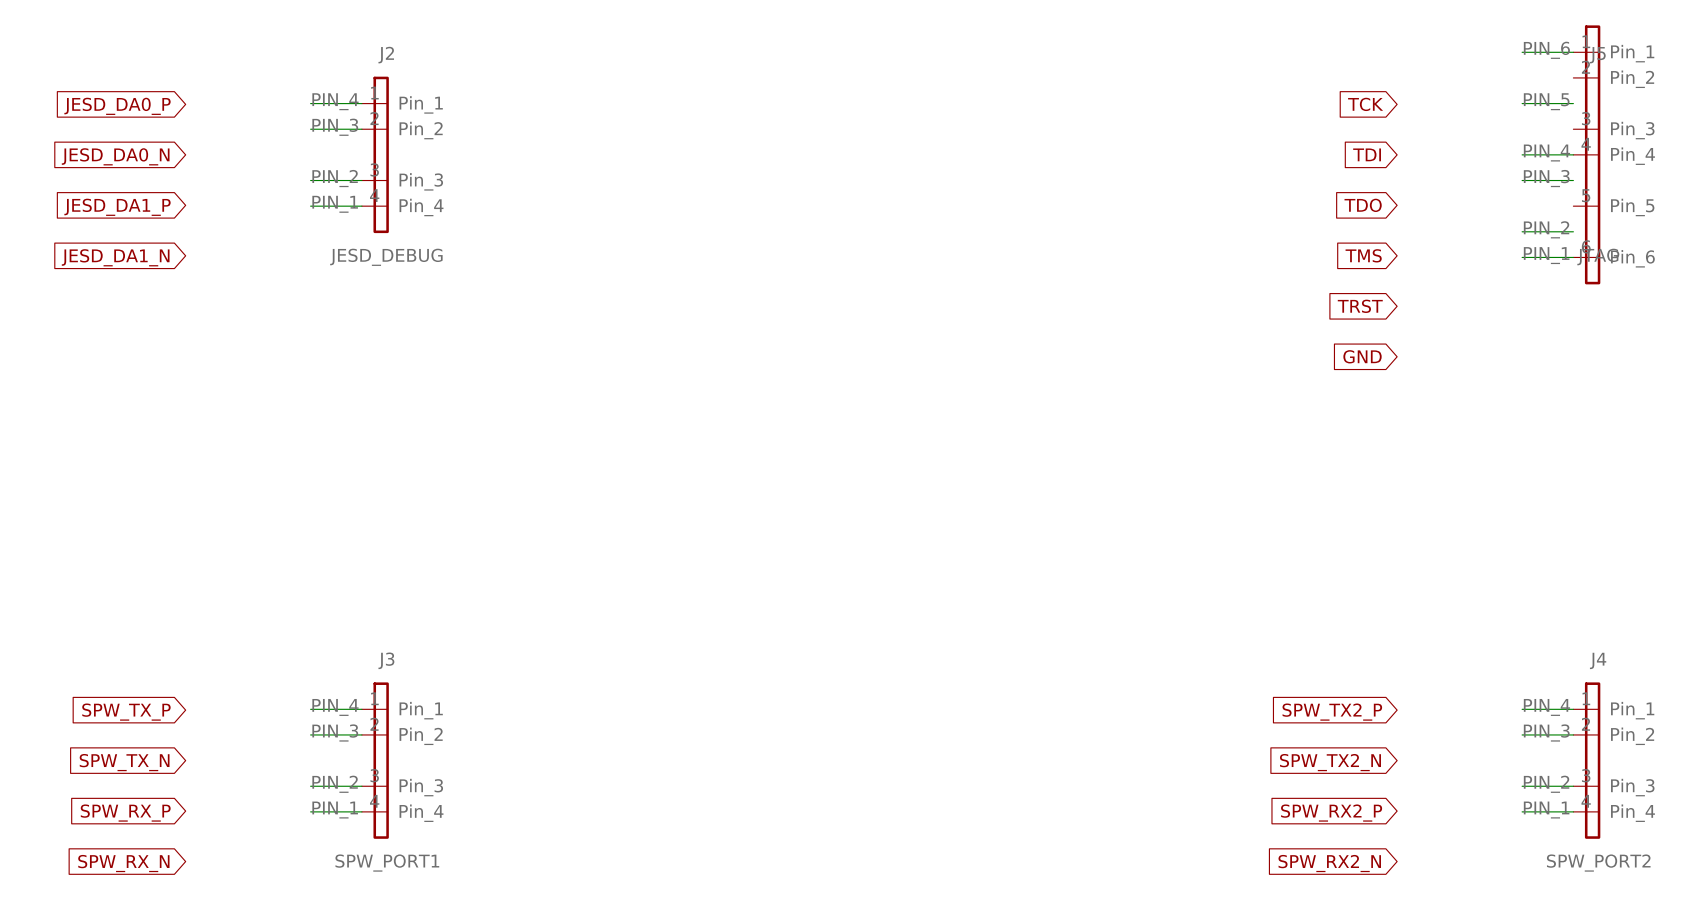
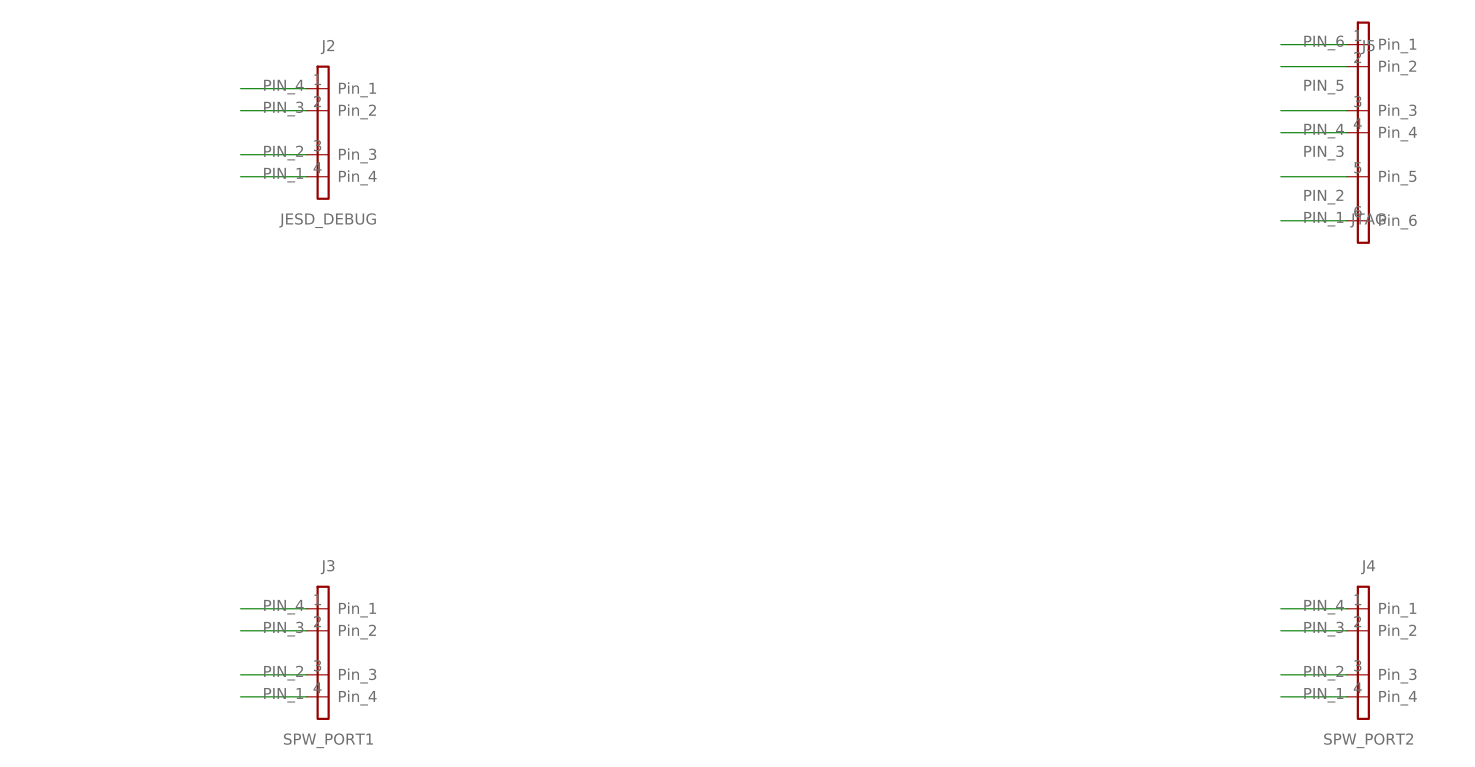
wire: none -> (1280, 44) (1302, 44)
wire: none -> (1280, 66) (1346, 66)
wire: none -> (240, 88) (262, 88)
wire: (1522, 103) (1573, 103) -> none
global label: TCK (1365, 104) -> none
global label: JESD_DA0_P (117, 106) -> none
wire: none -> (240, 110) (262, 110)
wire: none -> (1280, 110) (1346, 110)
global label: TDI (1367, 154) -> none
wire: none -> (1280, 132) (1302, 132)
global label: JESD_DA0_N (115, 156) -> none
wire: none -> (240, 154) (262, 154)
wire: (1522, 180) (1573, 180) -> none
global label: TDO (1363, 205) -> none
wire: none -> (240, 176) (262, 176)
wire: none -> (1280, 176) (1346, 176)
global label: JESD_DA1_P (117, 207) -> none
wire: (1522, 231) (1573, 231) -> none
global label: TMS (1363, 255) -> none
global label: JESD_DA1_N (115, 257) -> none
wire: none -> (1280, 220) (1302, 220)
global label: TRST (1360, 306) -> none
global label: GND (1362, 356) -> none
wire: none -> (240, 608) (262, 608)
wire: none -> (1280, 608) (1302, 608)
global label: SPW_TX_P (126, 712) -> none
global label: SPW_TX2_P (1332, 712) -> none
wire: none -> (240, 630) (262, 630)
wire: none -> (1280, 630) (1302, 630)
global label: SPW_TX_N (124, 762) -> none
global label: SPW_TX2_N (1330, 762) -> none
wire: none -> (240, 674) (262, 674)
wire: none -> (1280, 674) (1302, 674)
wire: none -> (240, 696) (262, 696)
wire: none -> (1280, 696) (1302, 696)
global label: SPW_RX_P (125, 813) -> none
global label: SPW_RX2_P (1331, 813) -> none
global label: SPW_RX_N (123, 863) -> none
global label: SPW_RX2_N (1329, 863) -> none

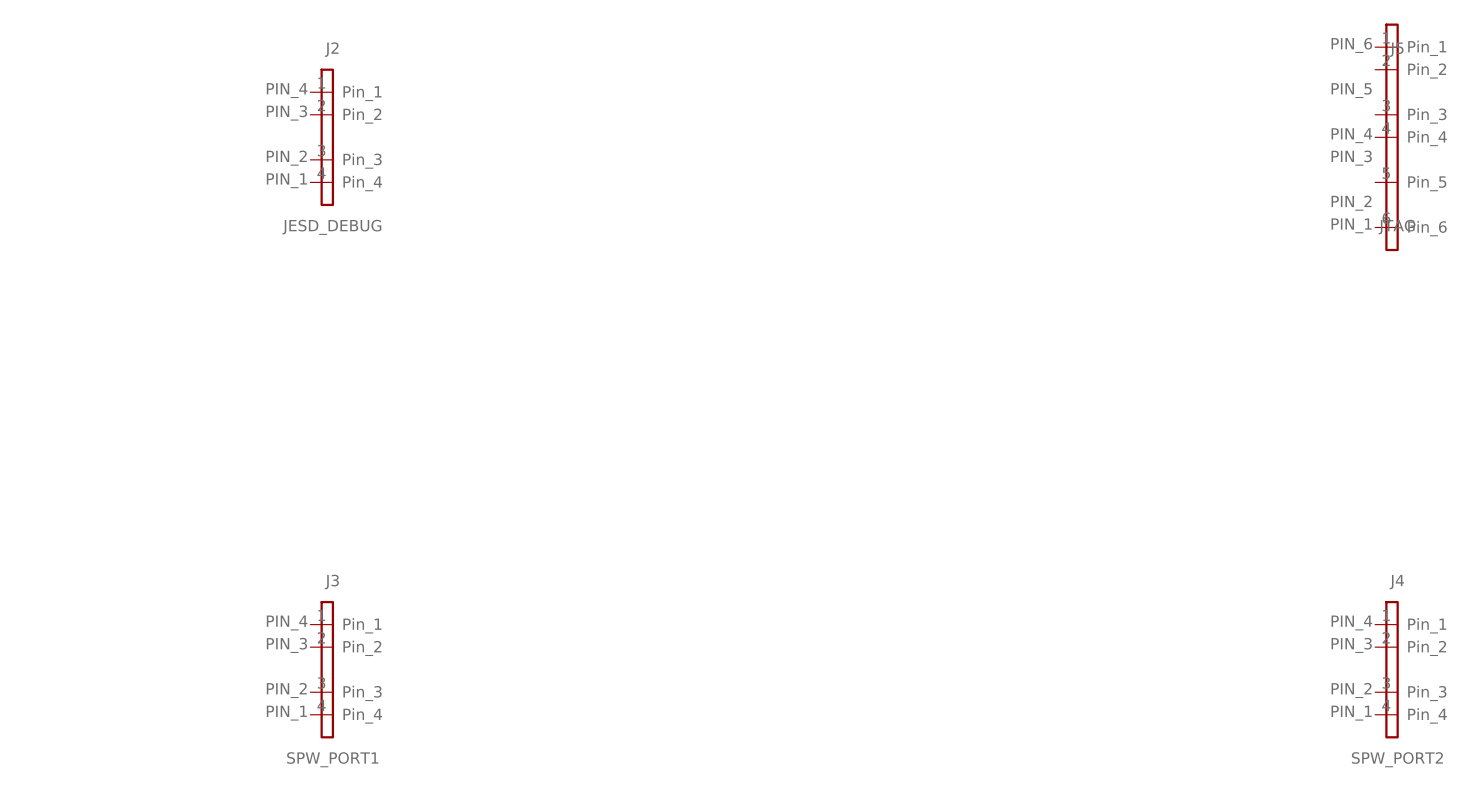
wire: (1280, 44) (1346, 44) -> none
wire: (1280, 66) (1346, 66) -> none
wire: (240, 88) (306, 88) -> none
wire: (240, 110) (306, 110) -> none
wire: (1280, 110) (1346, 110) -> none
wire: (1280, 132) (1346, 132) -> none
wire: (240, 154) (306, 154) -> none
wire: (240, 176) (306, 176) -> none
wire: (1280, 176) (1346, 176) -> none
wire: (1280, 220) (1346, 220) -> none
wire: (240, 608) (306, 608) -> none
wire: (1280, 608) (1346, 608) -> none
wire: (240, 630) (306, 630) -> none
wire: (1280, 630) (1346, 630) -> none
wire: (240, 674) (306, 674) -> none
wire: (1280, 674) (1346, 674) -> none
wire: (240, 696) (306, 696) -> none
wire: (1280, 696) (1346, 696) -> none

